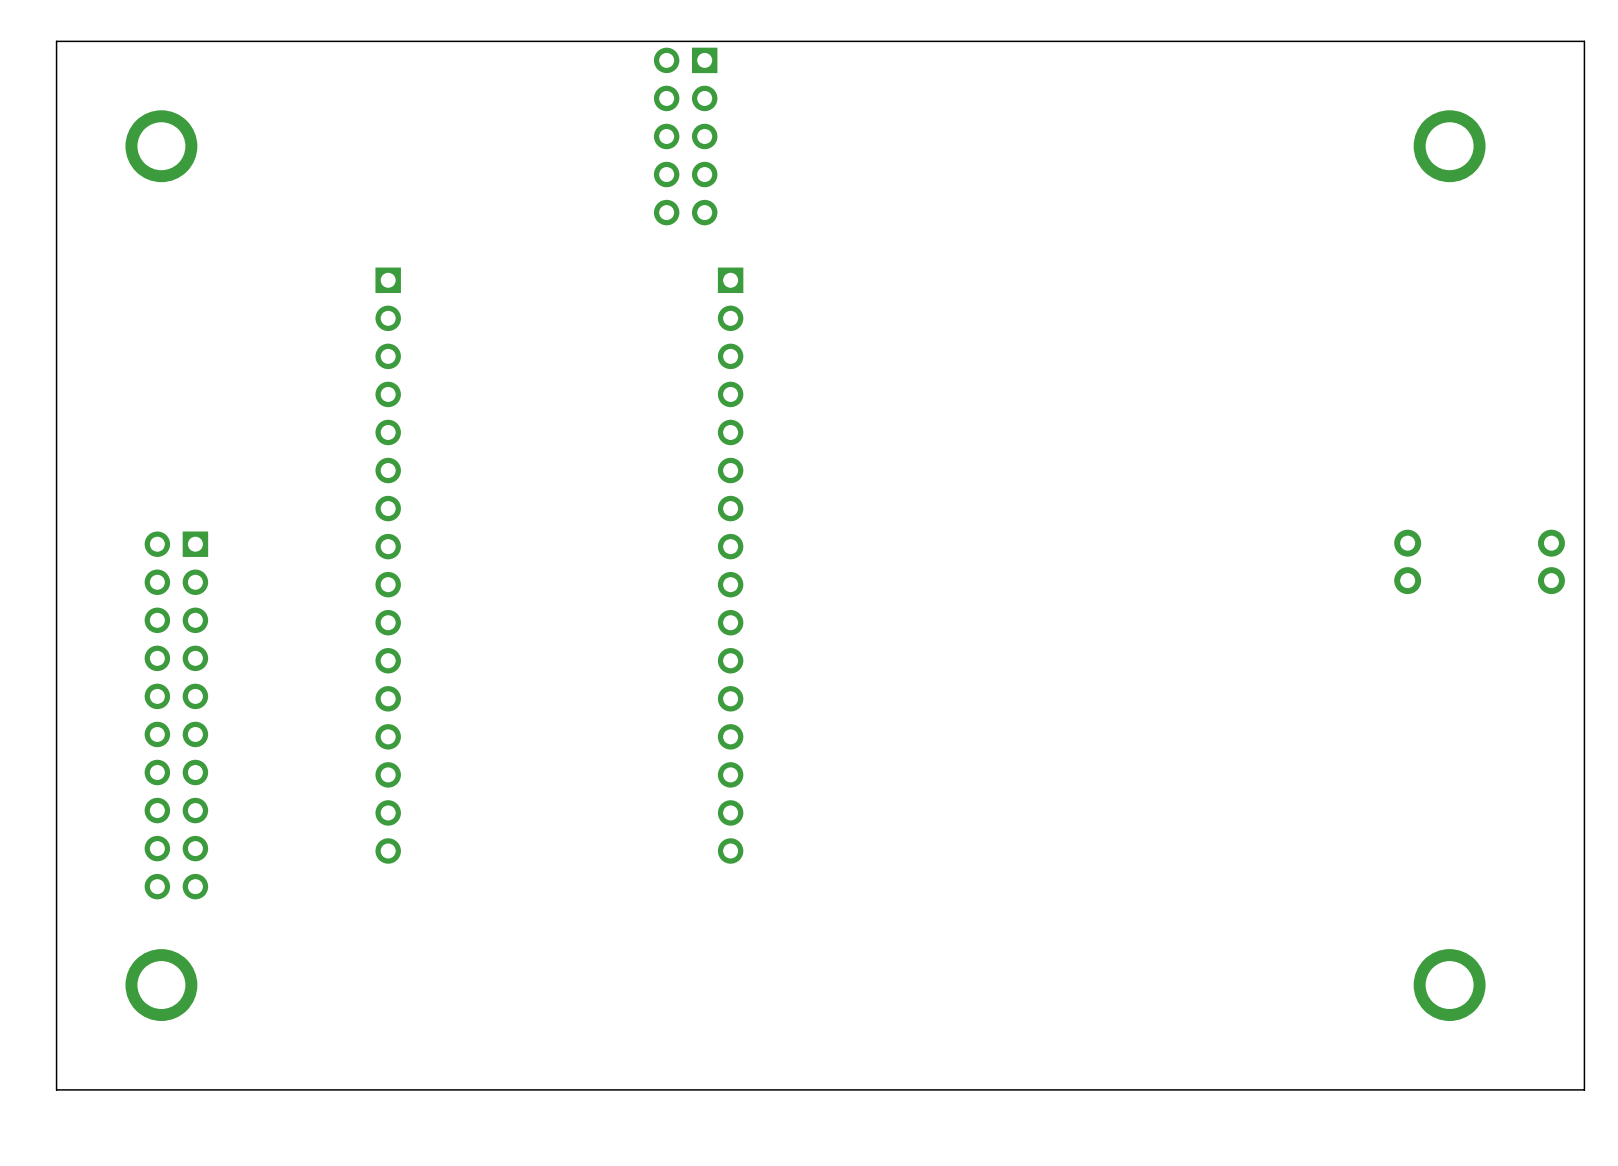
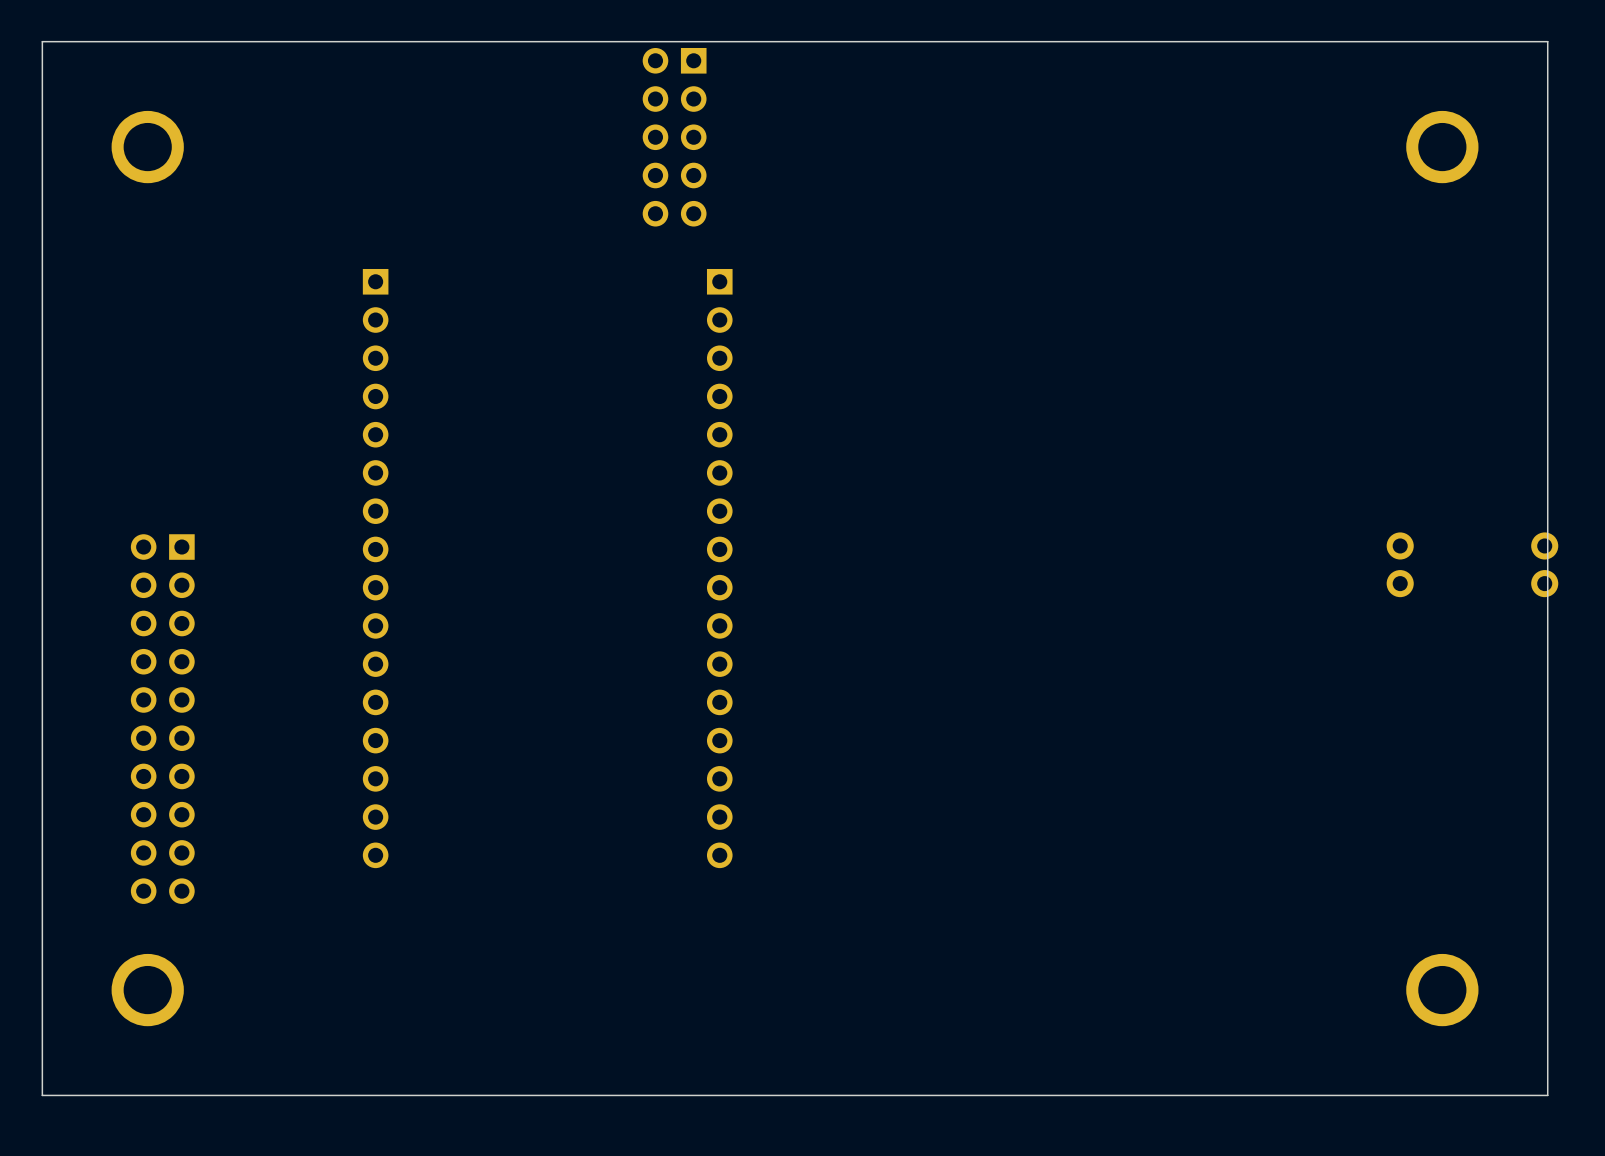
board edge: (1554, 41) (1584, 41) (1584, 1089) (1554, 1089) -> (1547, 41) (1547, 1095)

